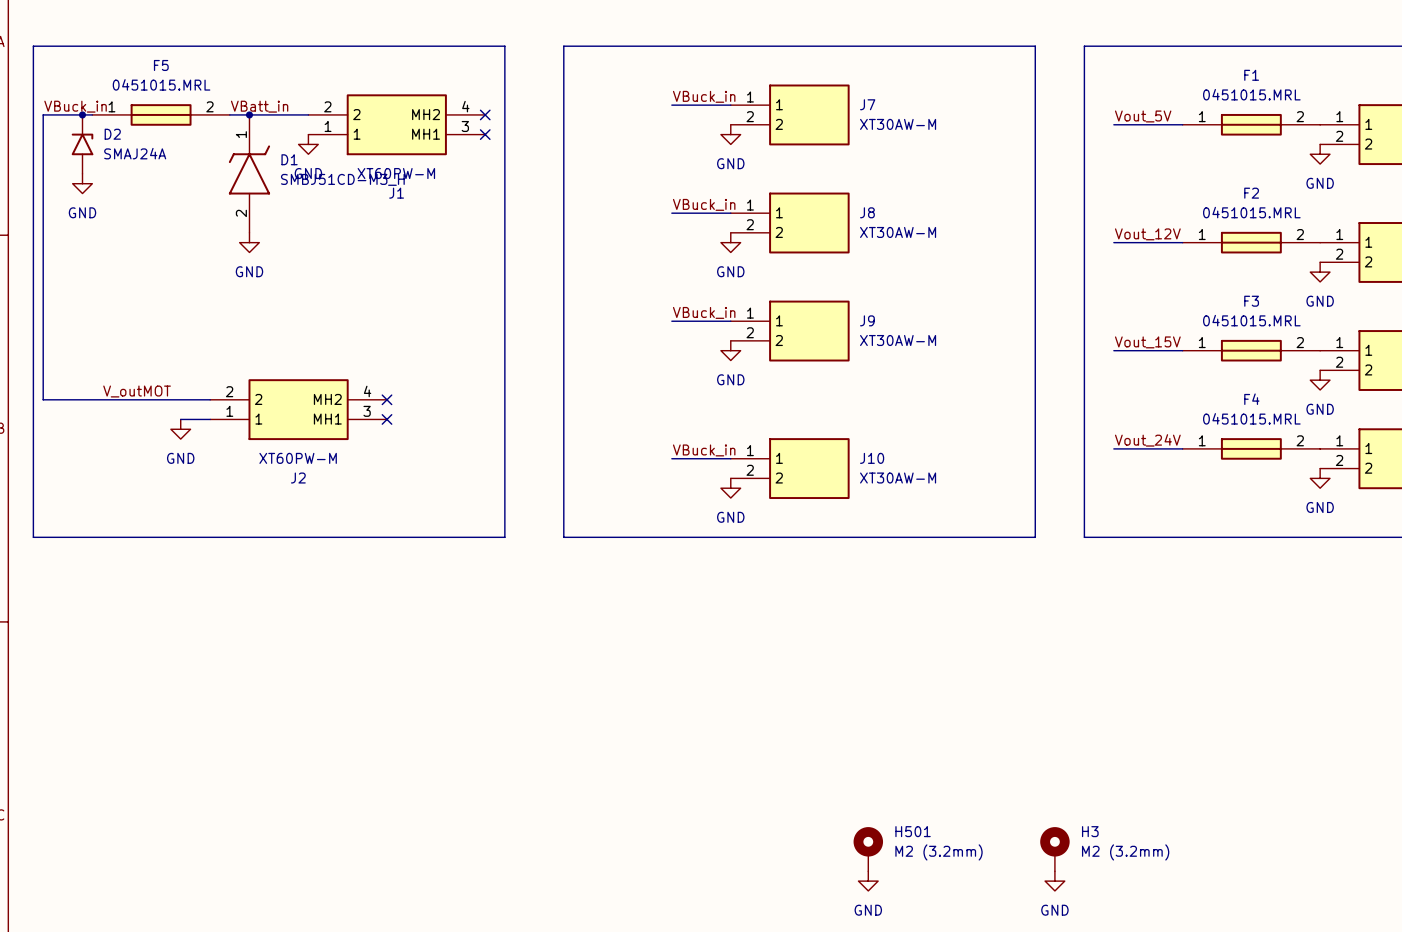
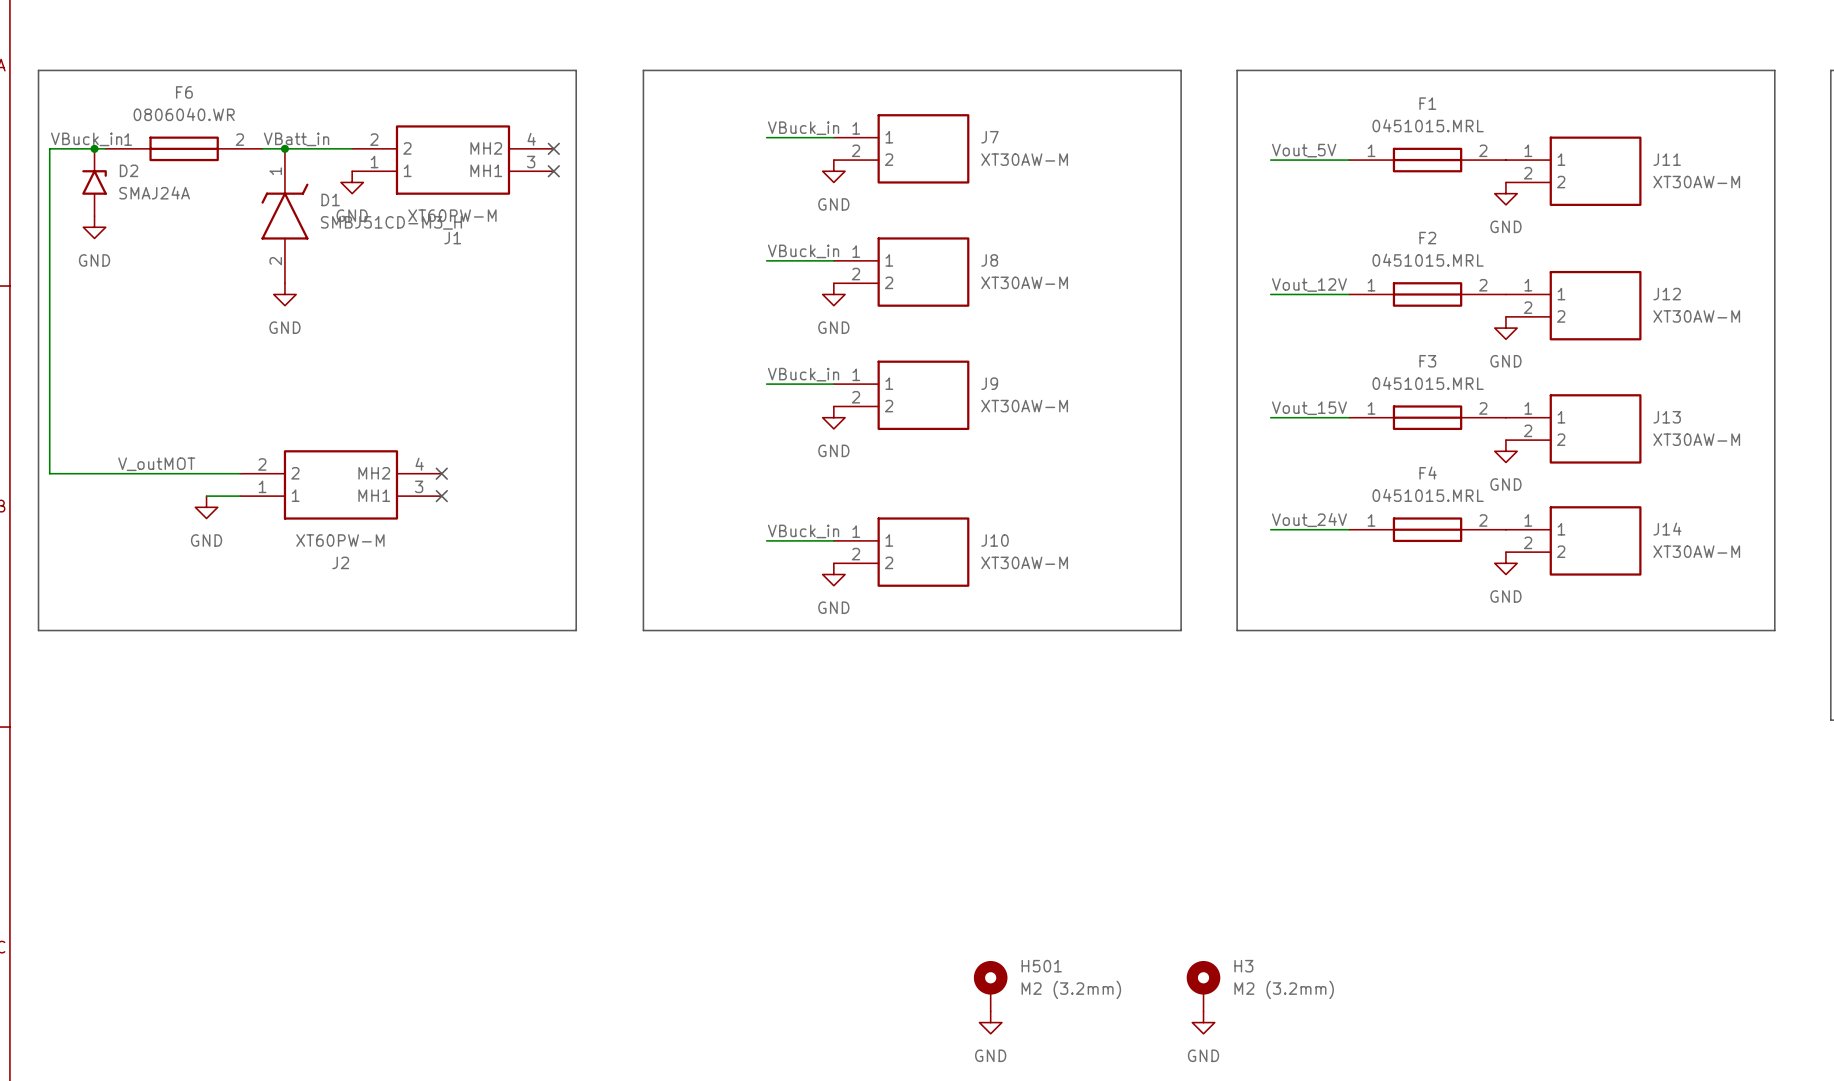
F5 name: F5 (161, 65) -> F6 (184, 92)
F5 value: 0451015.MRL (161, 84) -> 0806040.WR (184, 114)

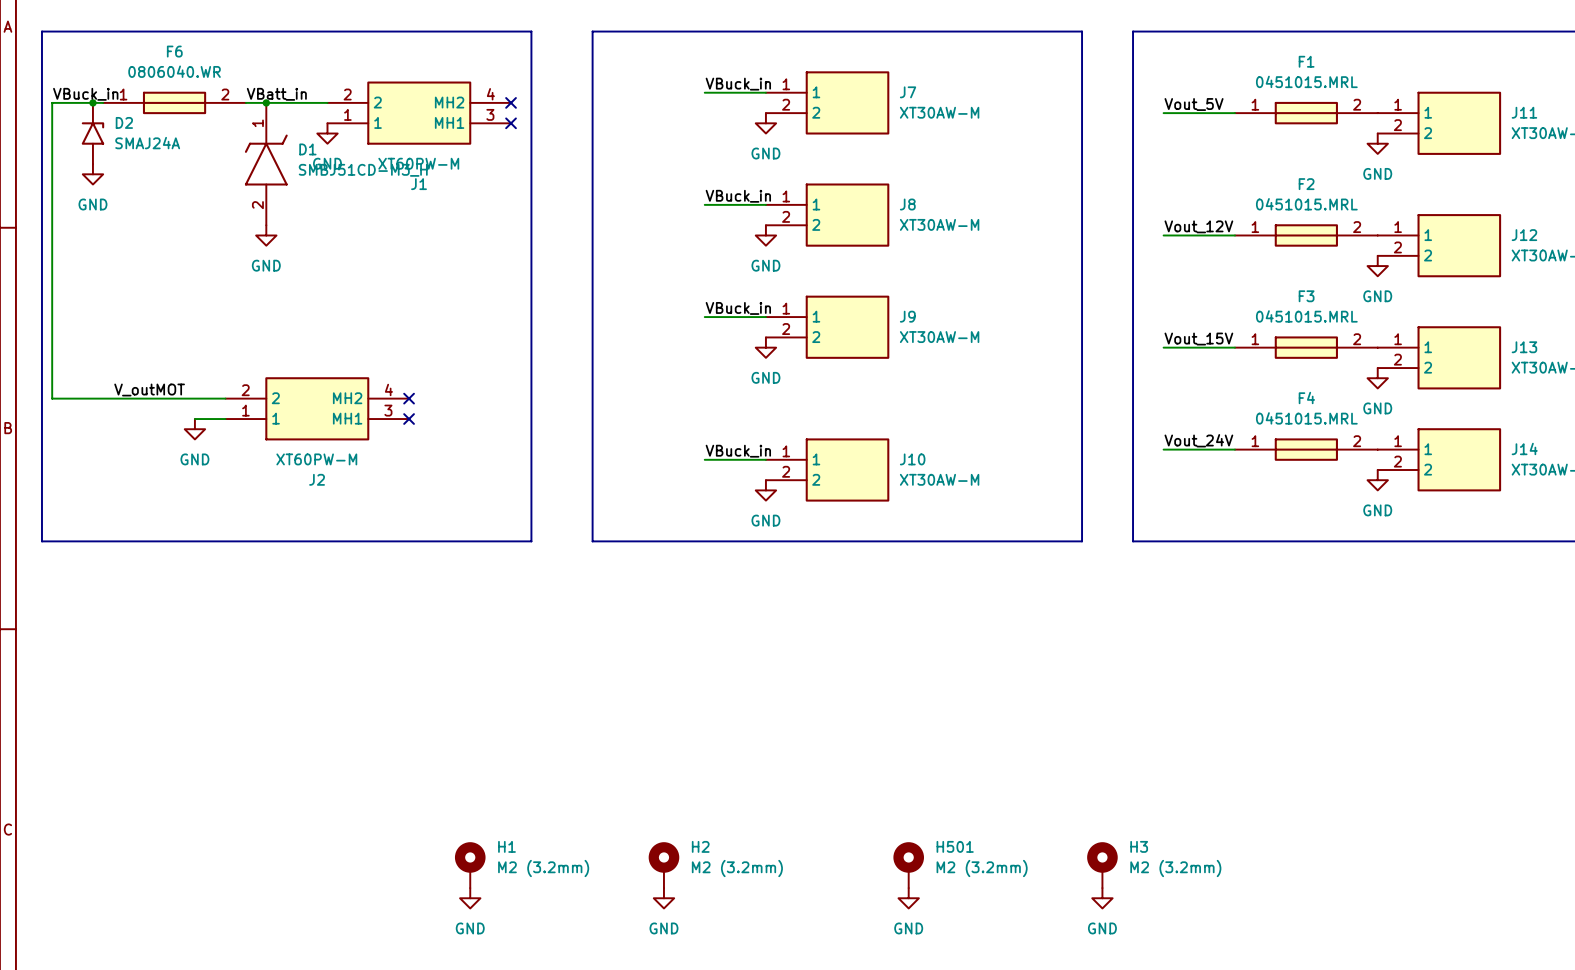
H1: none -> M2 (3.2mm) (470, 865)
H2: none -> M2 (3.2mm) (663, 865)
power symbol: none -> GND (470, 898)
power symbol: none -> GND (663, 898)

